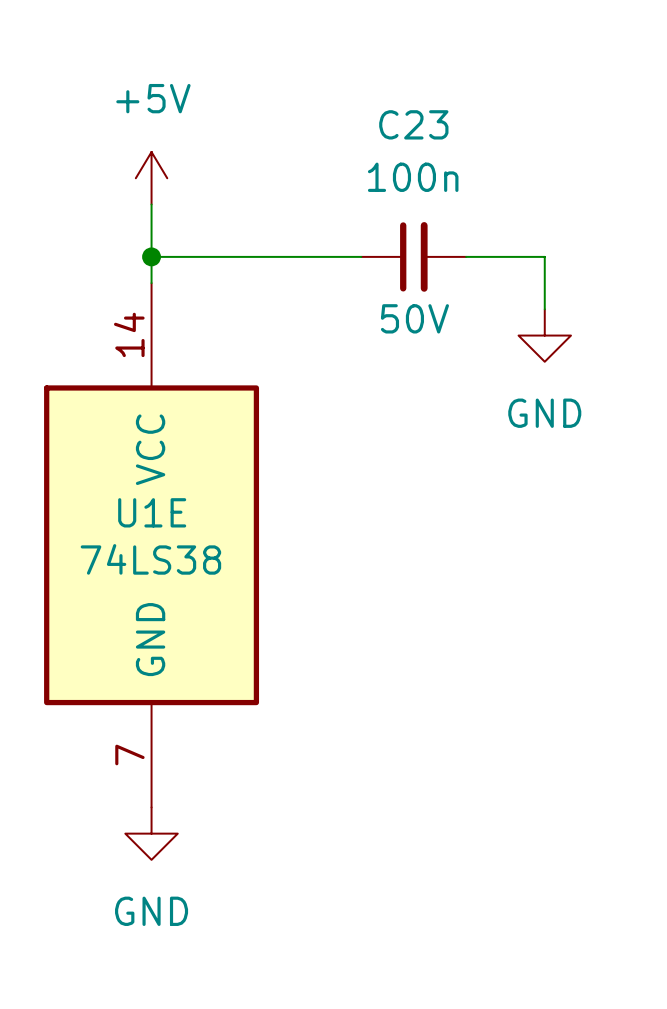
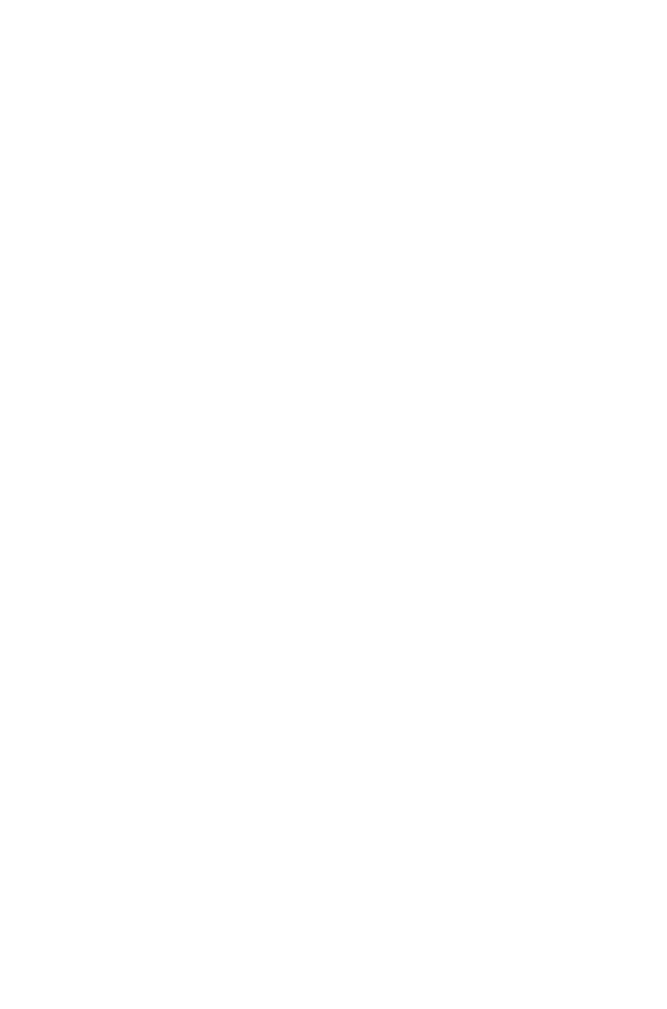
power symbol: +5V (151, 178) -> none
wire: (151, 204) (151, 283) -> none
wire: (151, 256) (361, 256) -> none
junction: (151, 256) -> none
C23: 100n (413, 256) -> none
wire: (466, 256) (544, 256) (544, 309) -> none
power symbol: GND (544, 335) -> none
U1E: 74LS38 (151, 545) -> none
power symbol: GND (151, 833) -> none

